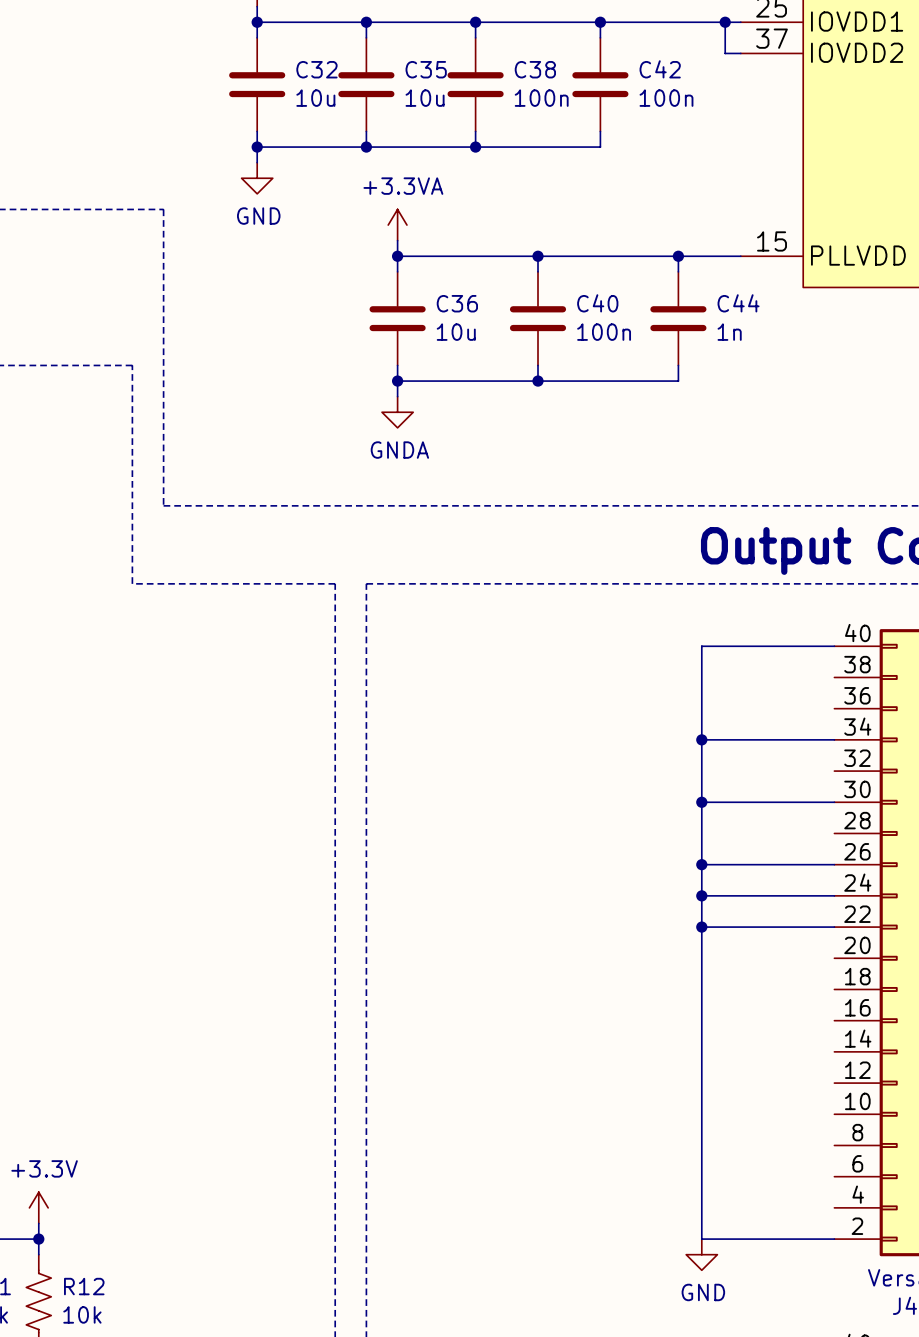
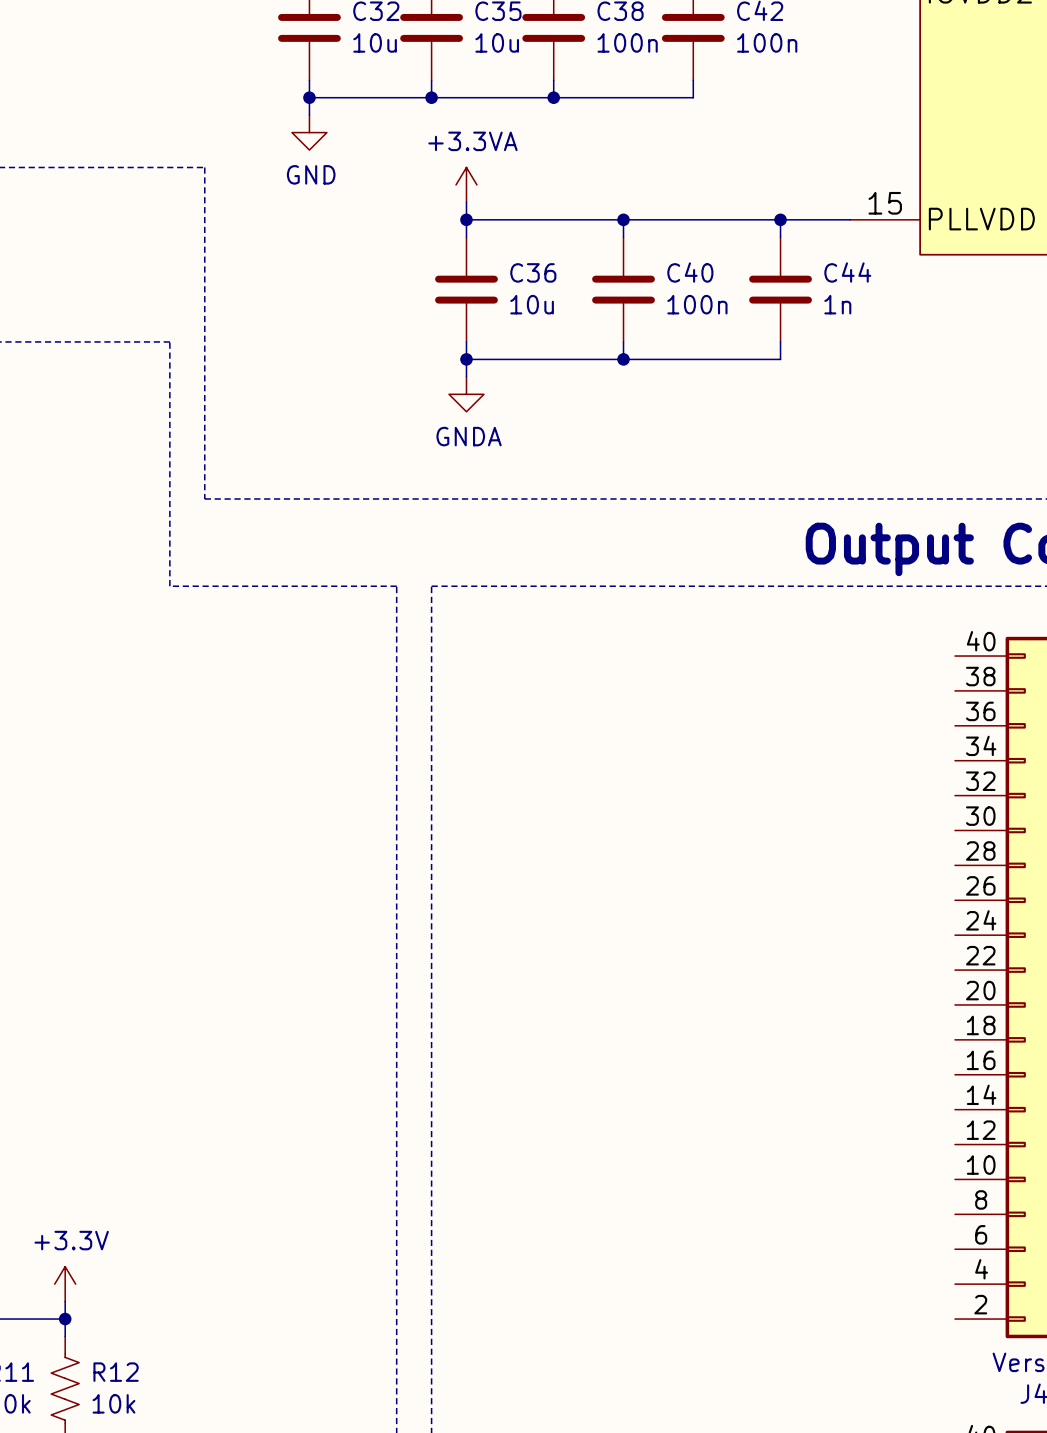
wire: (834, 646) (701, 646) (701, 1239) (834, 1239) -> none
wire: (701, 739) (834, 739) -> none
junction: (701, 739) -> none
wire: (701, 802) (834, 802) -> none
junction: (701, 802) -> none
wire: (701, 864) (834, 864) -> none
junction: (701, 864) -> none
wire: (701, 895) (834, 895) -> none
junction: (701, 895) -> none
wire: (701, 927) (834, 927) -> none
junction: (701, 927) -> none
power symbol: GND (701, 1254) -> none

